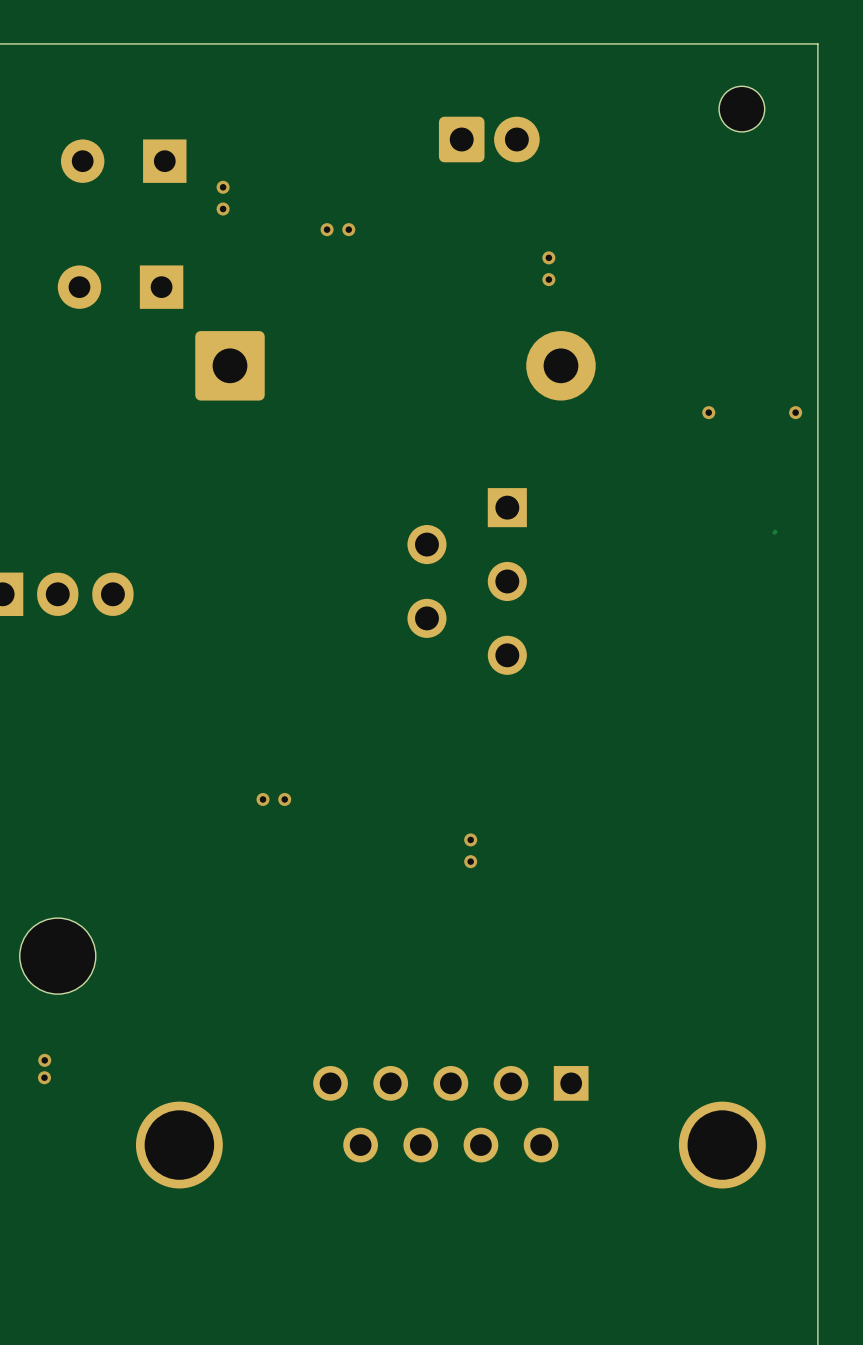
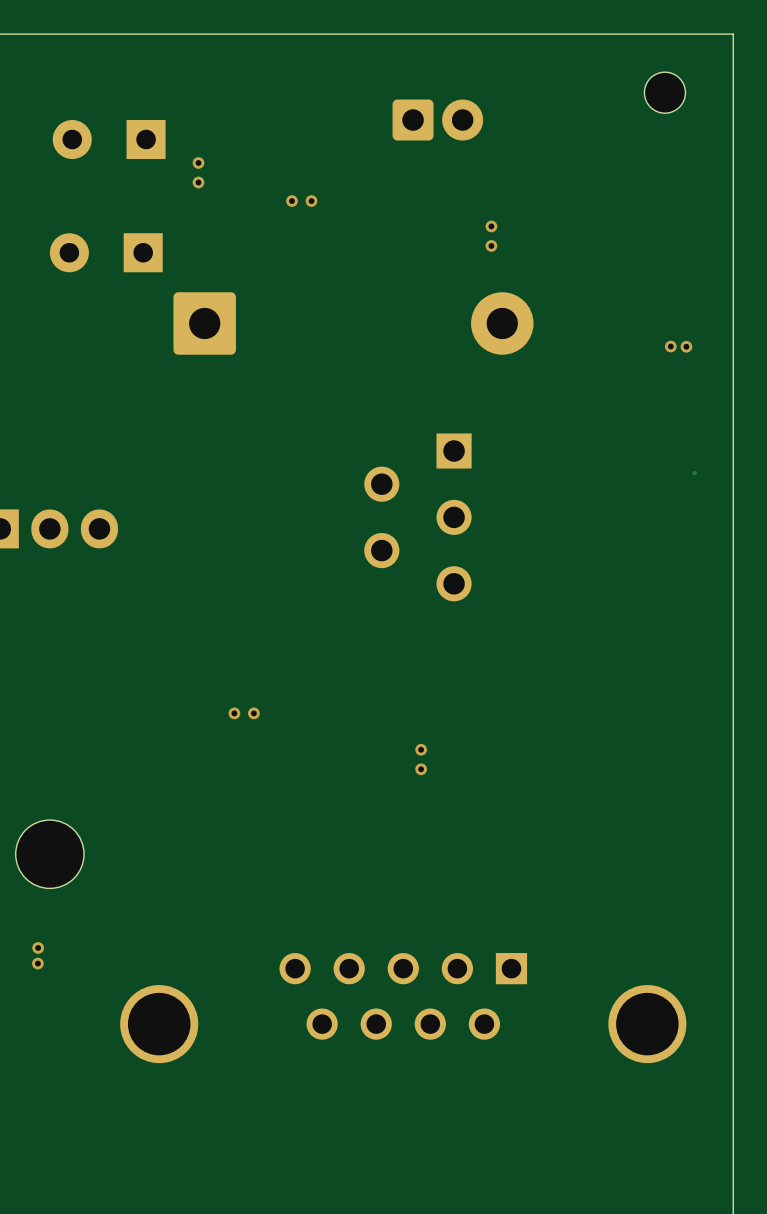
via: none -> (670, 346)
via: none -> (686, 346)
via: (708, 412) -> none
via: (795, 412) -> none

